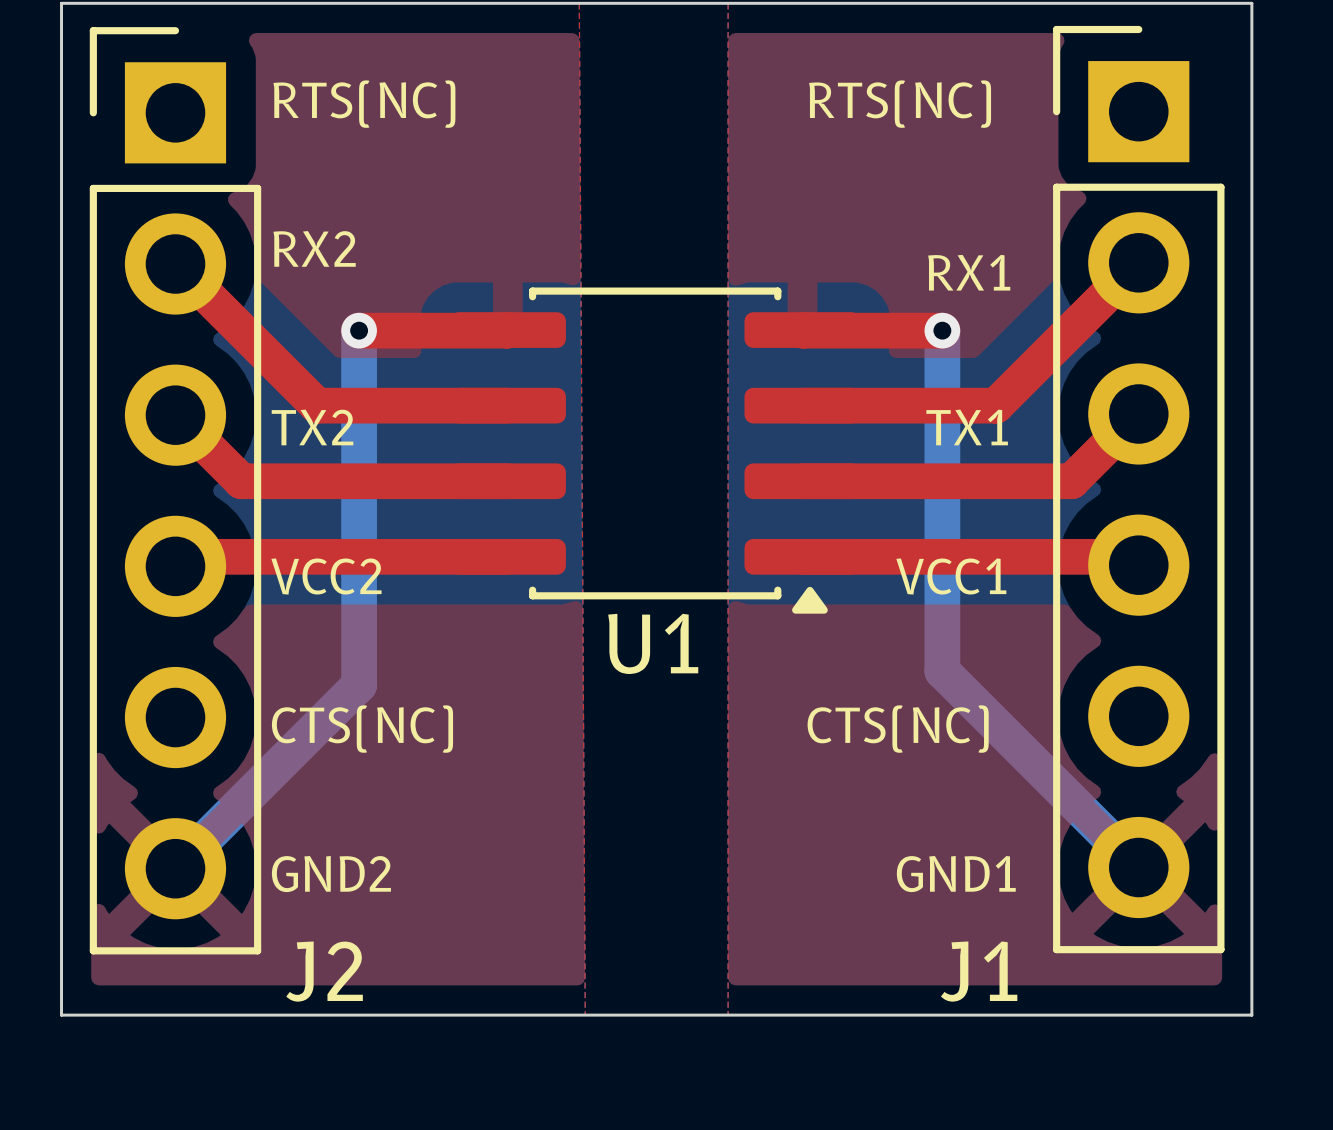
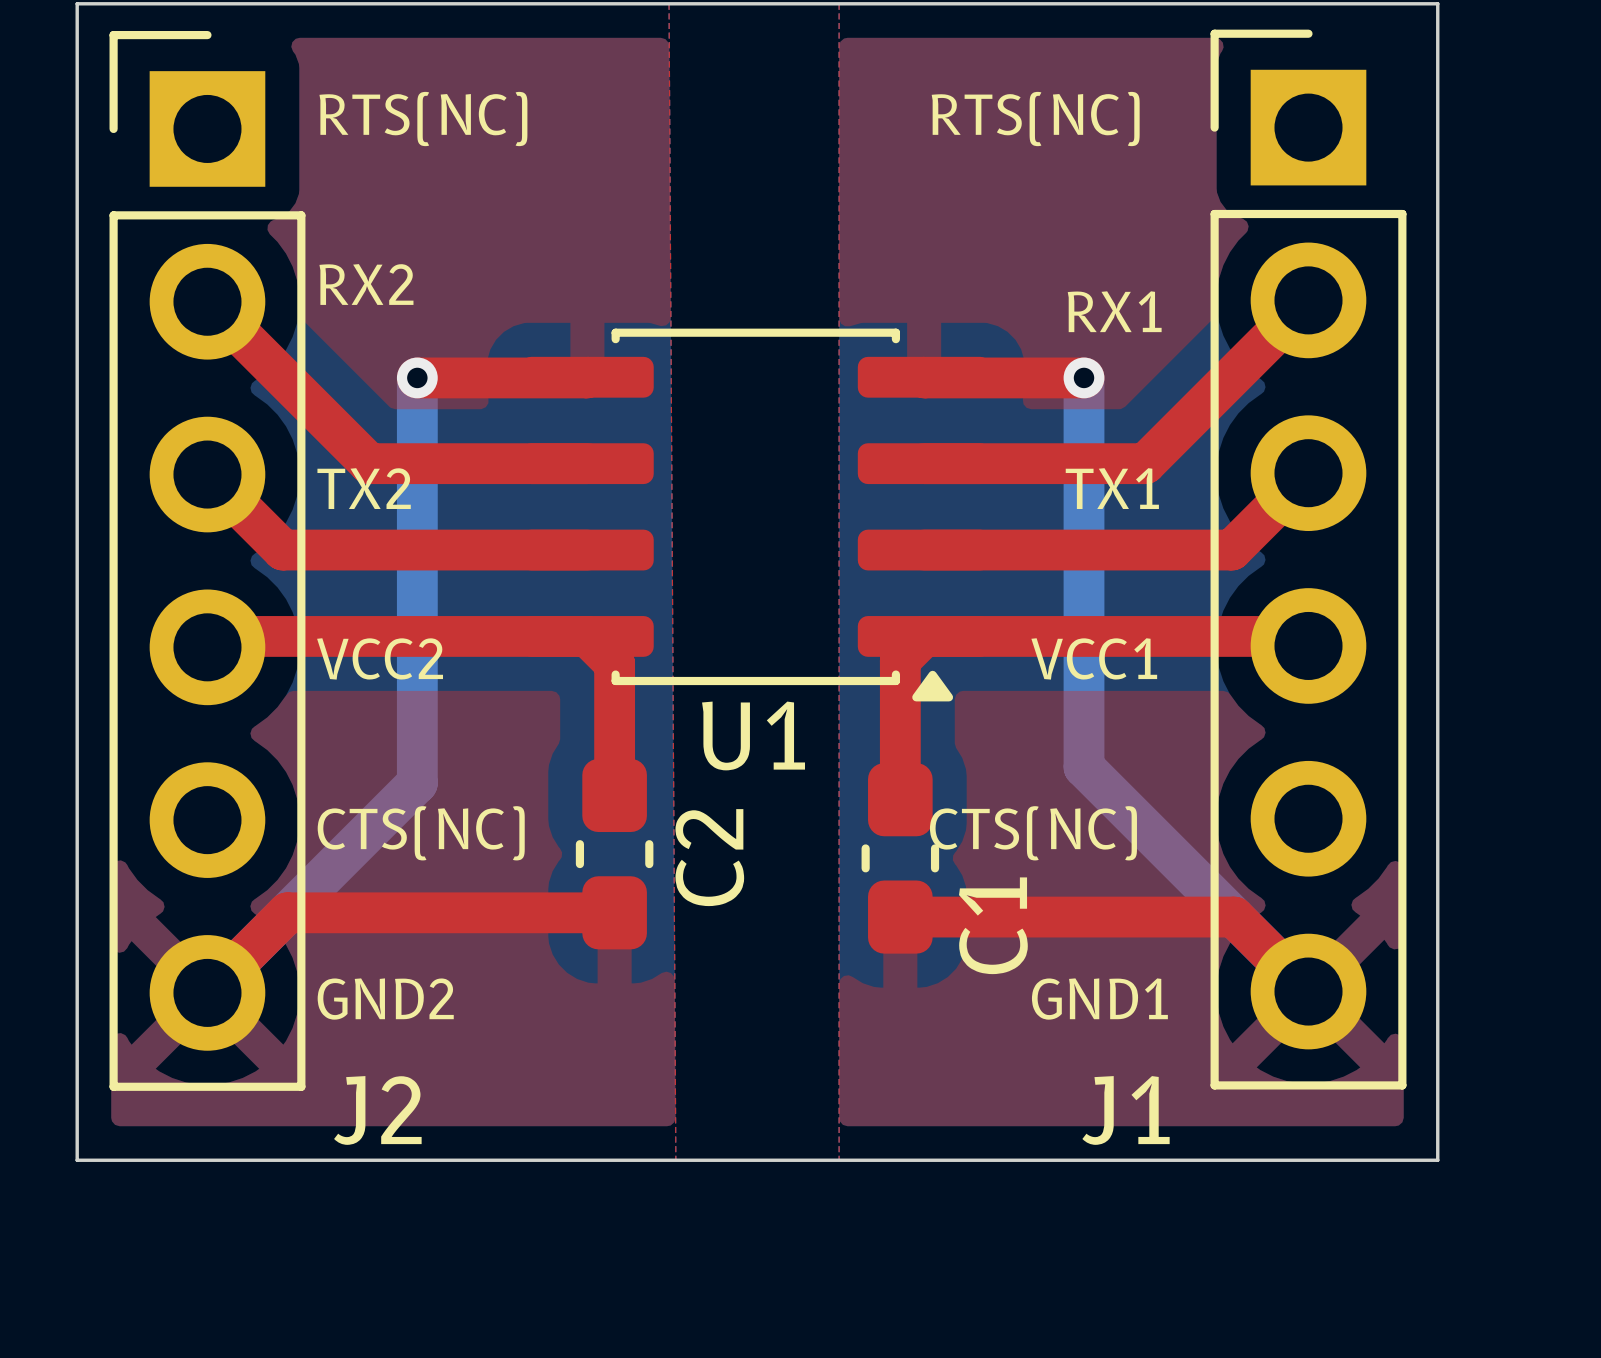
top track: none -> (587, 636) (614, 663) (614, 795)
top track: none -> (924, 636) (900, 660) (900, 799)
C2: none -> (614, 854)
C1: none -> (900, 858)
top track: none -> (614, 912) (287, 912) (207, 992)
top track: none -> (900, 917) (1234, 917) (1308, 991)

